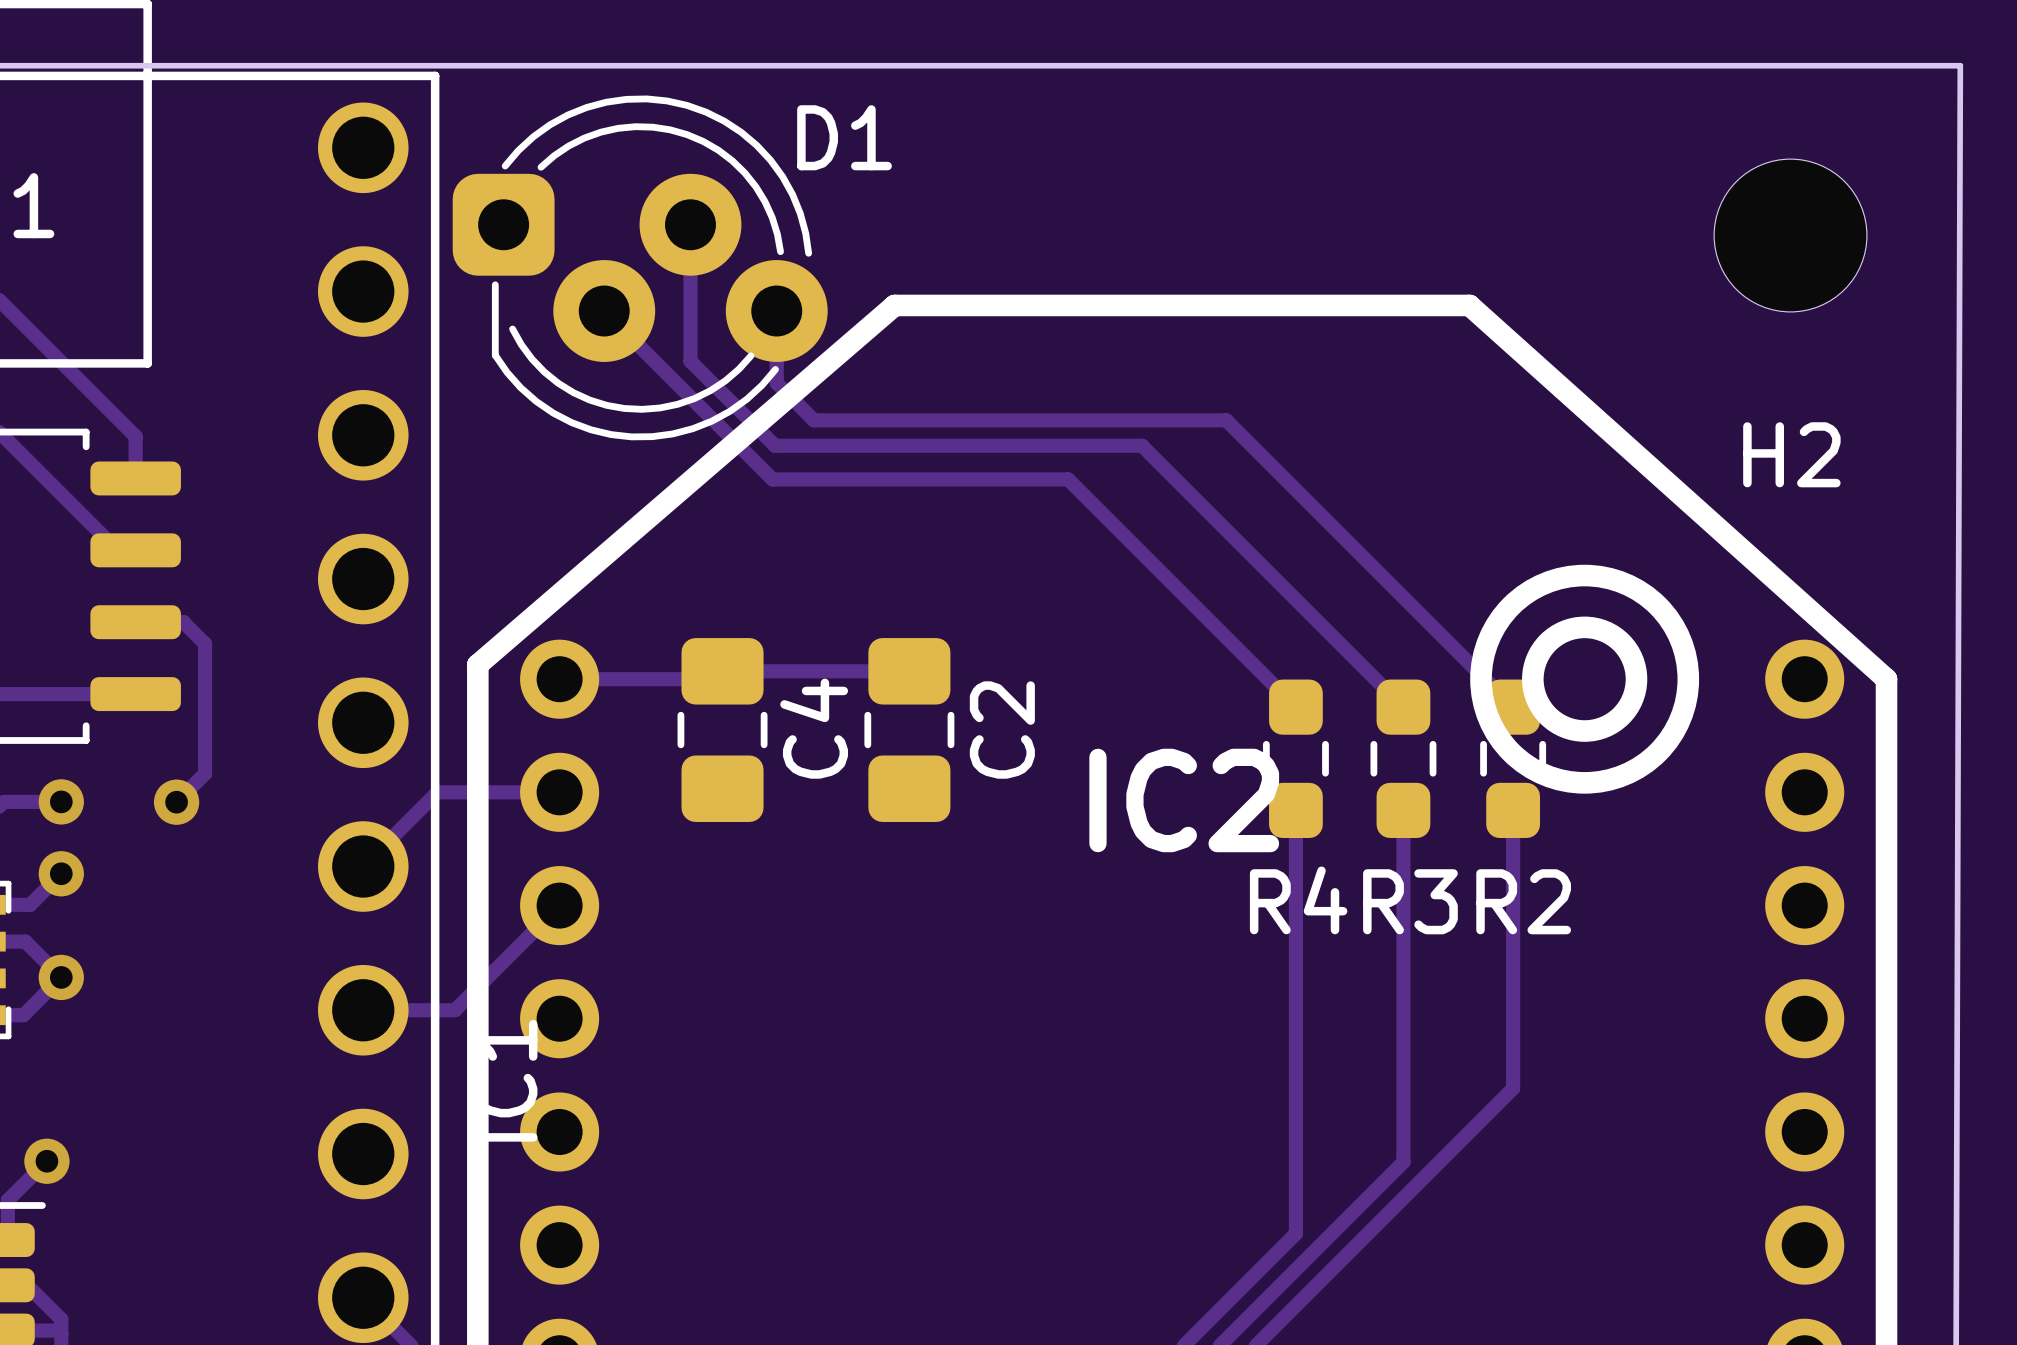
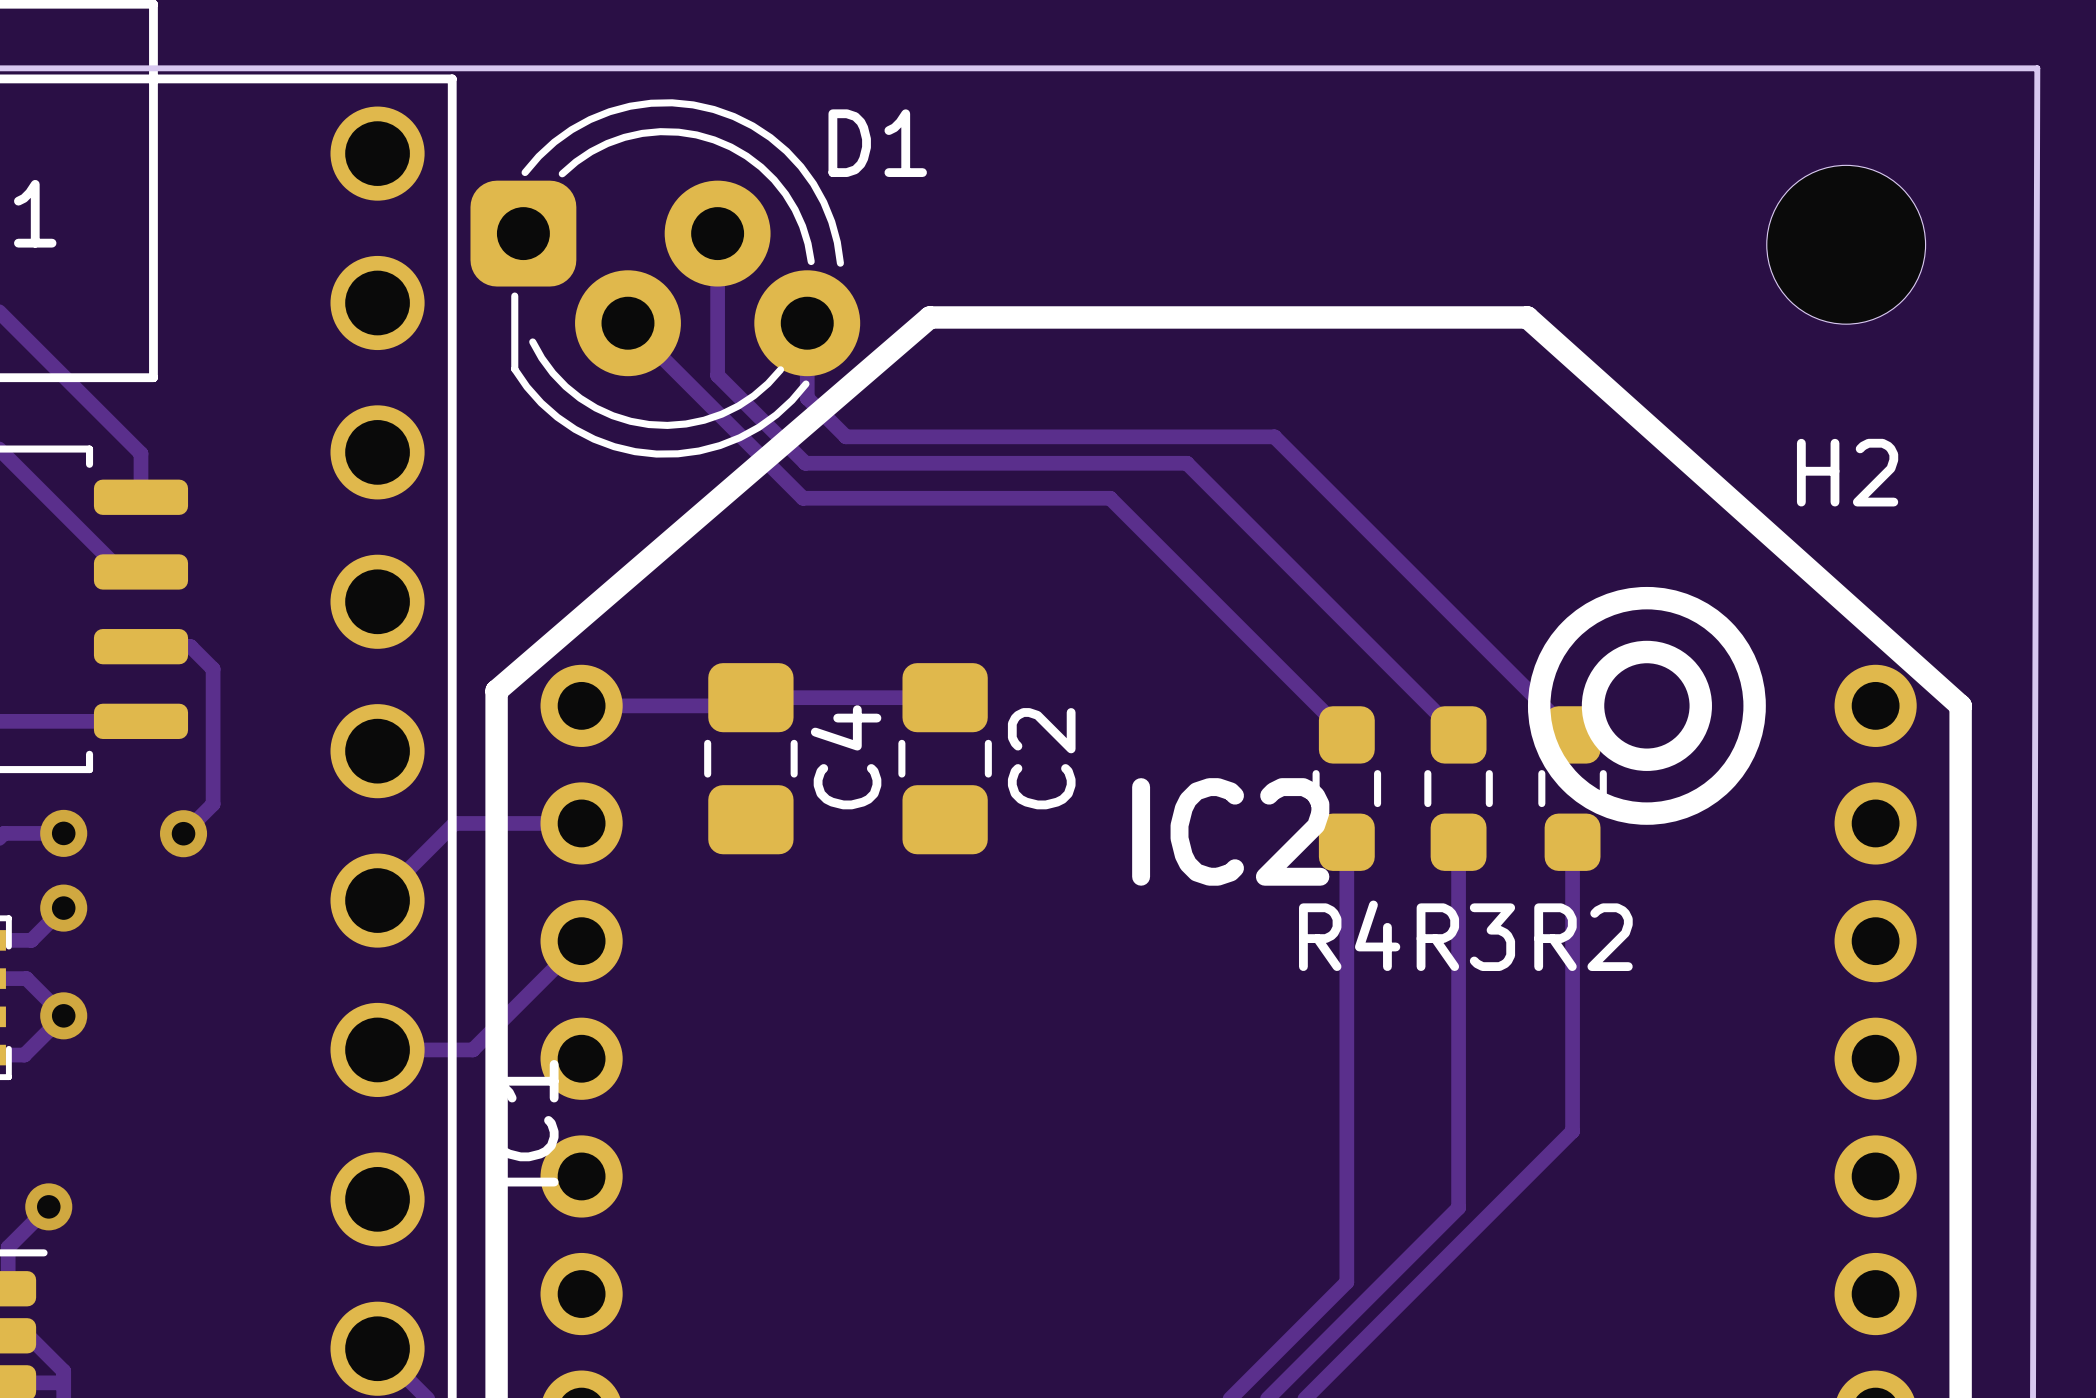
H2 position: (1790, 235) -> (1846, 244)

